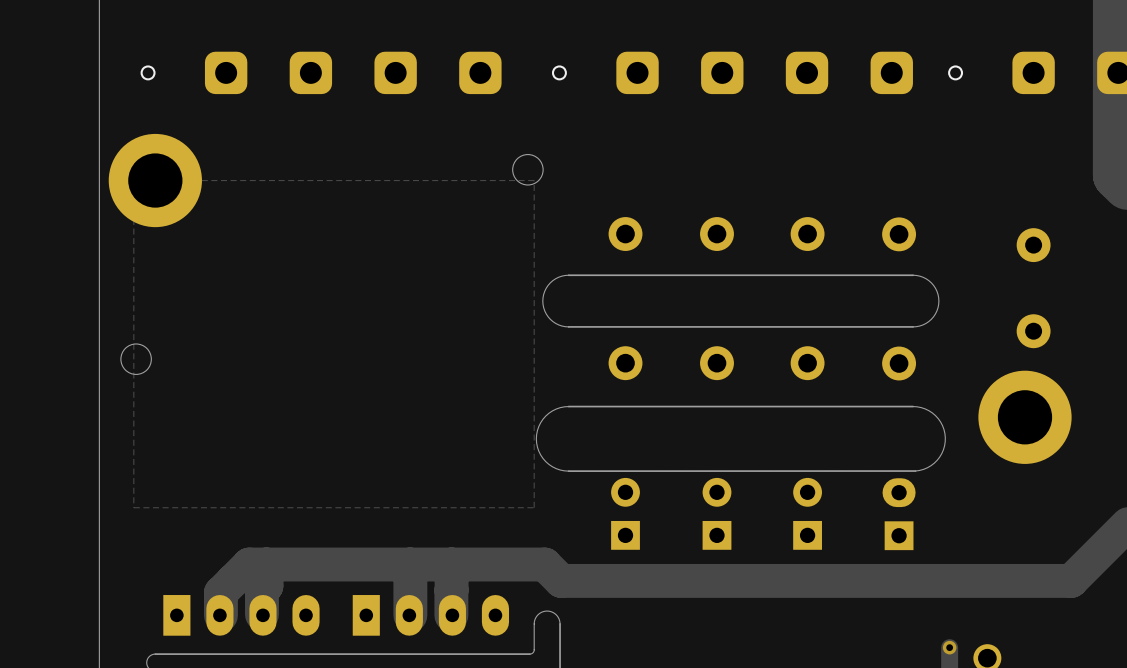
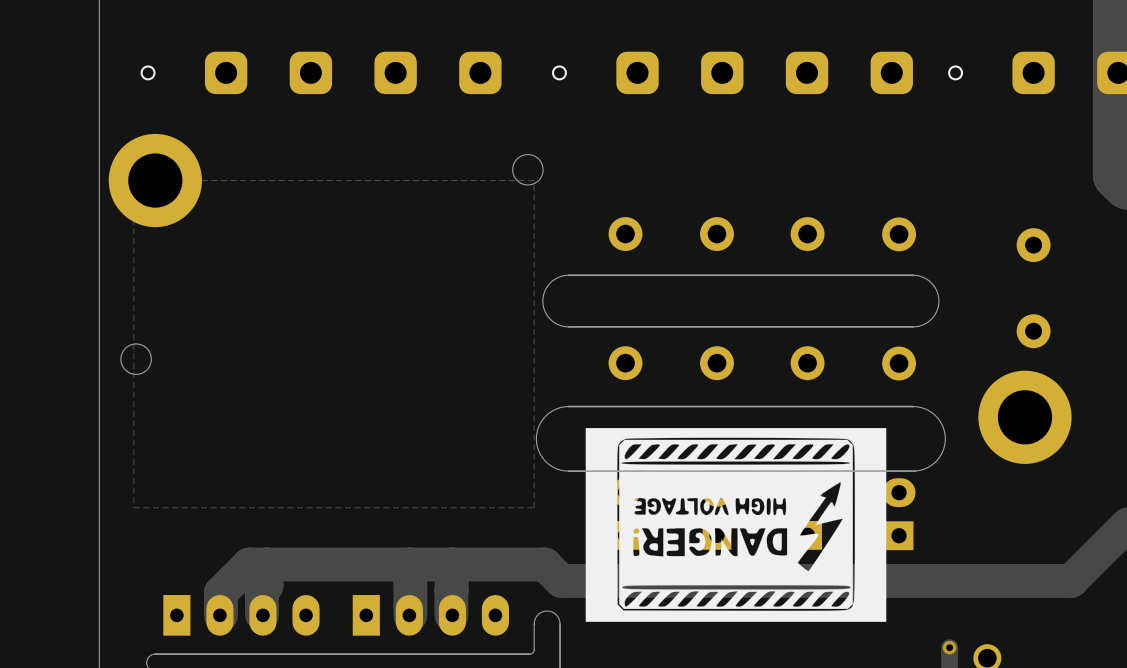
drawing: none -> [585, 427, 887, 622]

